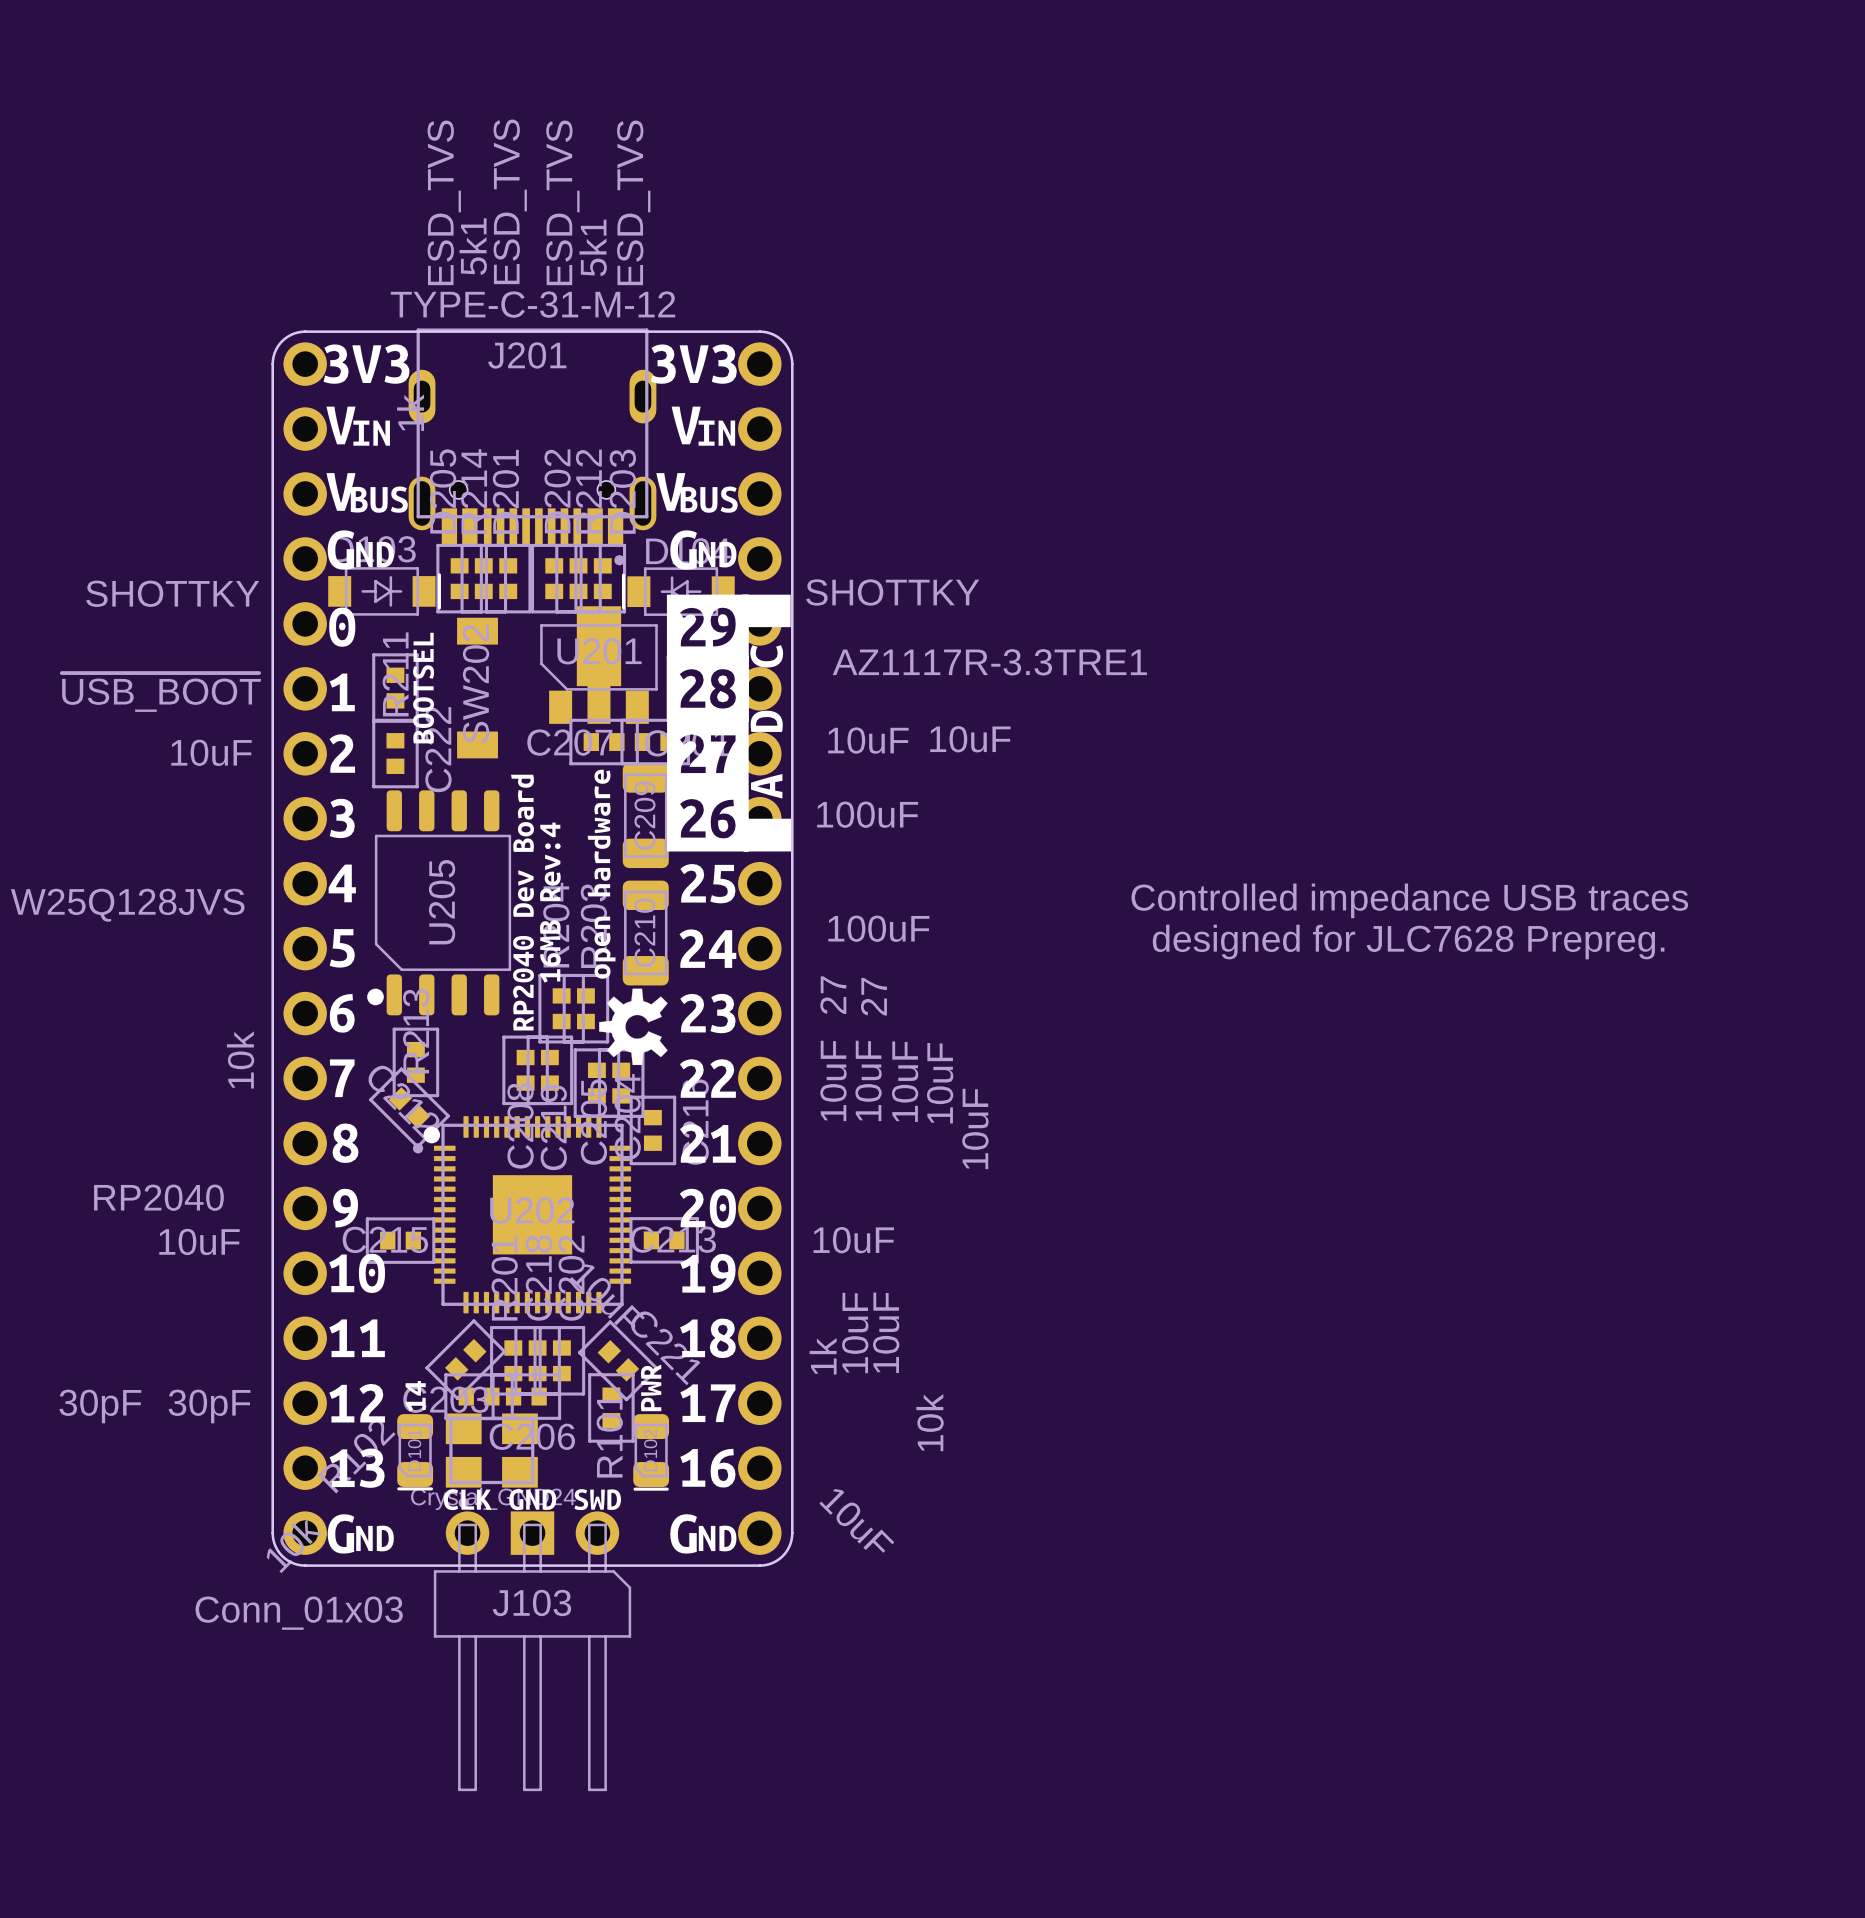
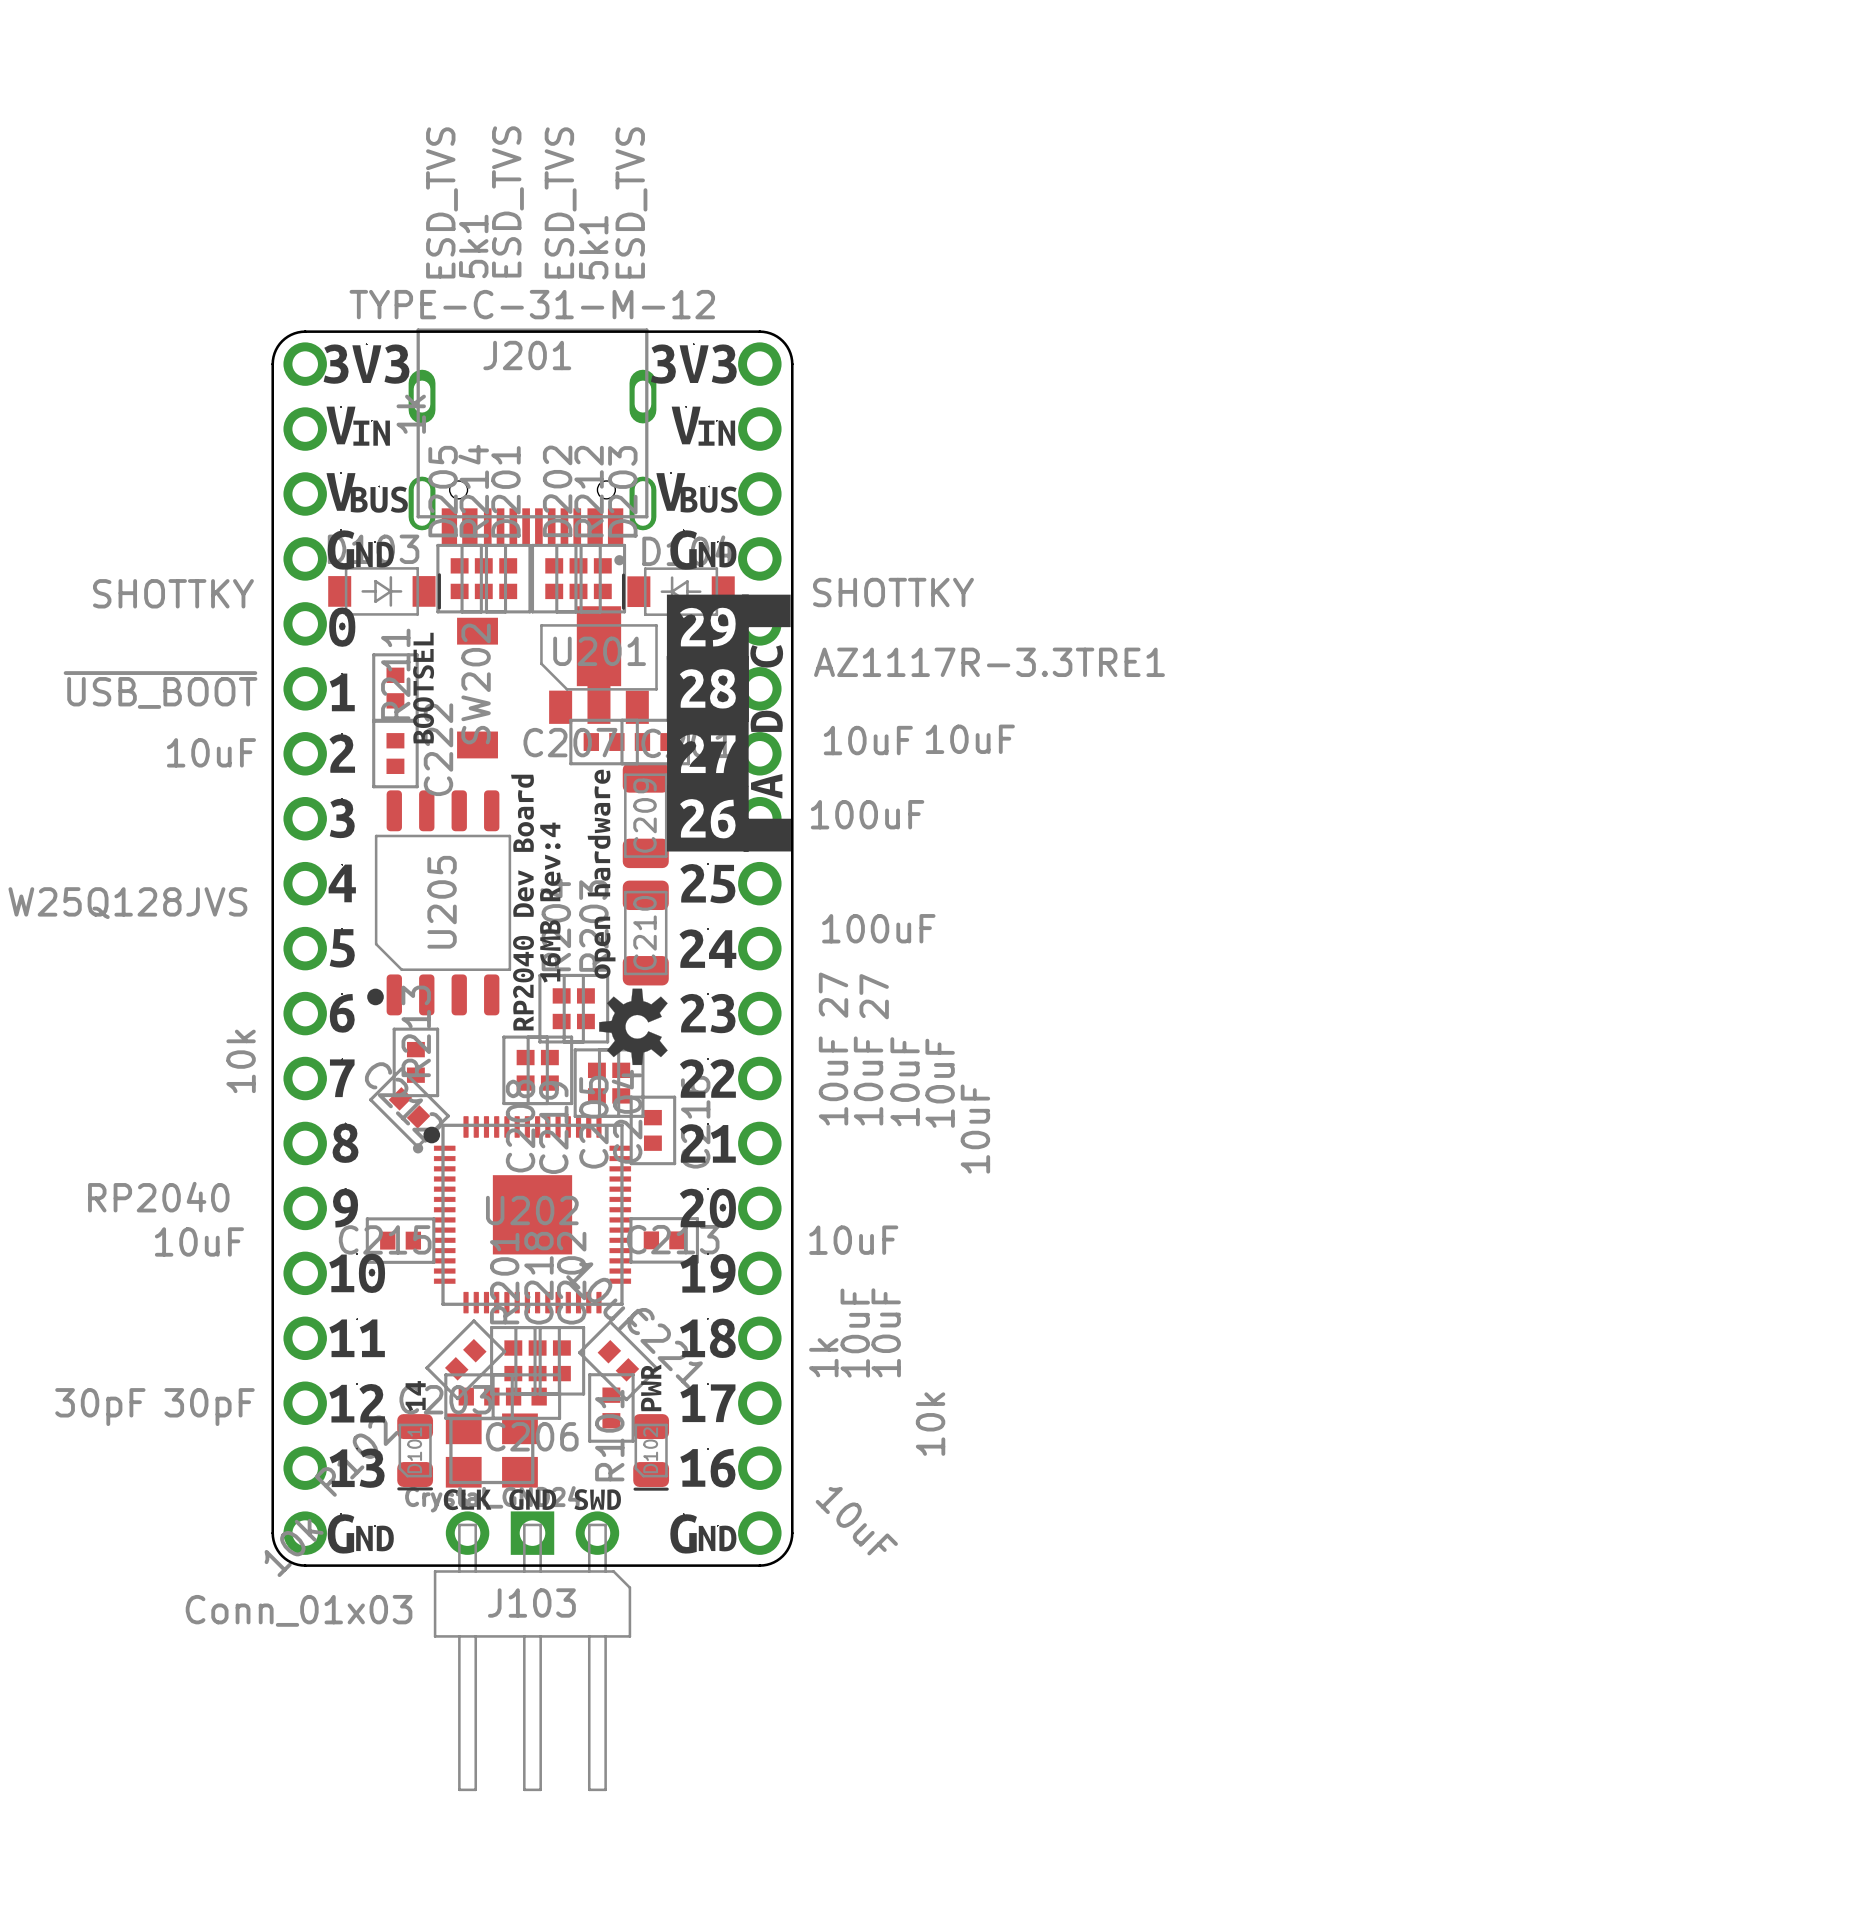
text: Controlled impedance USB traces (1409, 900) -> none
text: designed for JLC7628 Prepreg. (1408, 942) -> none

